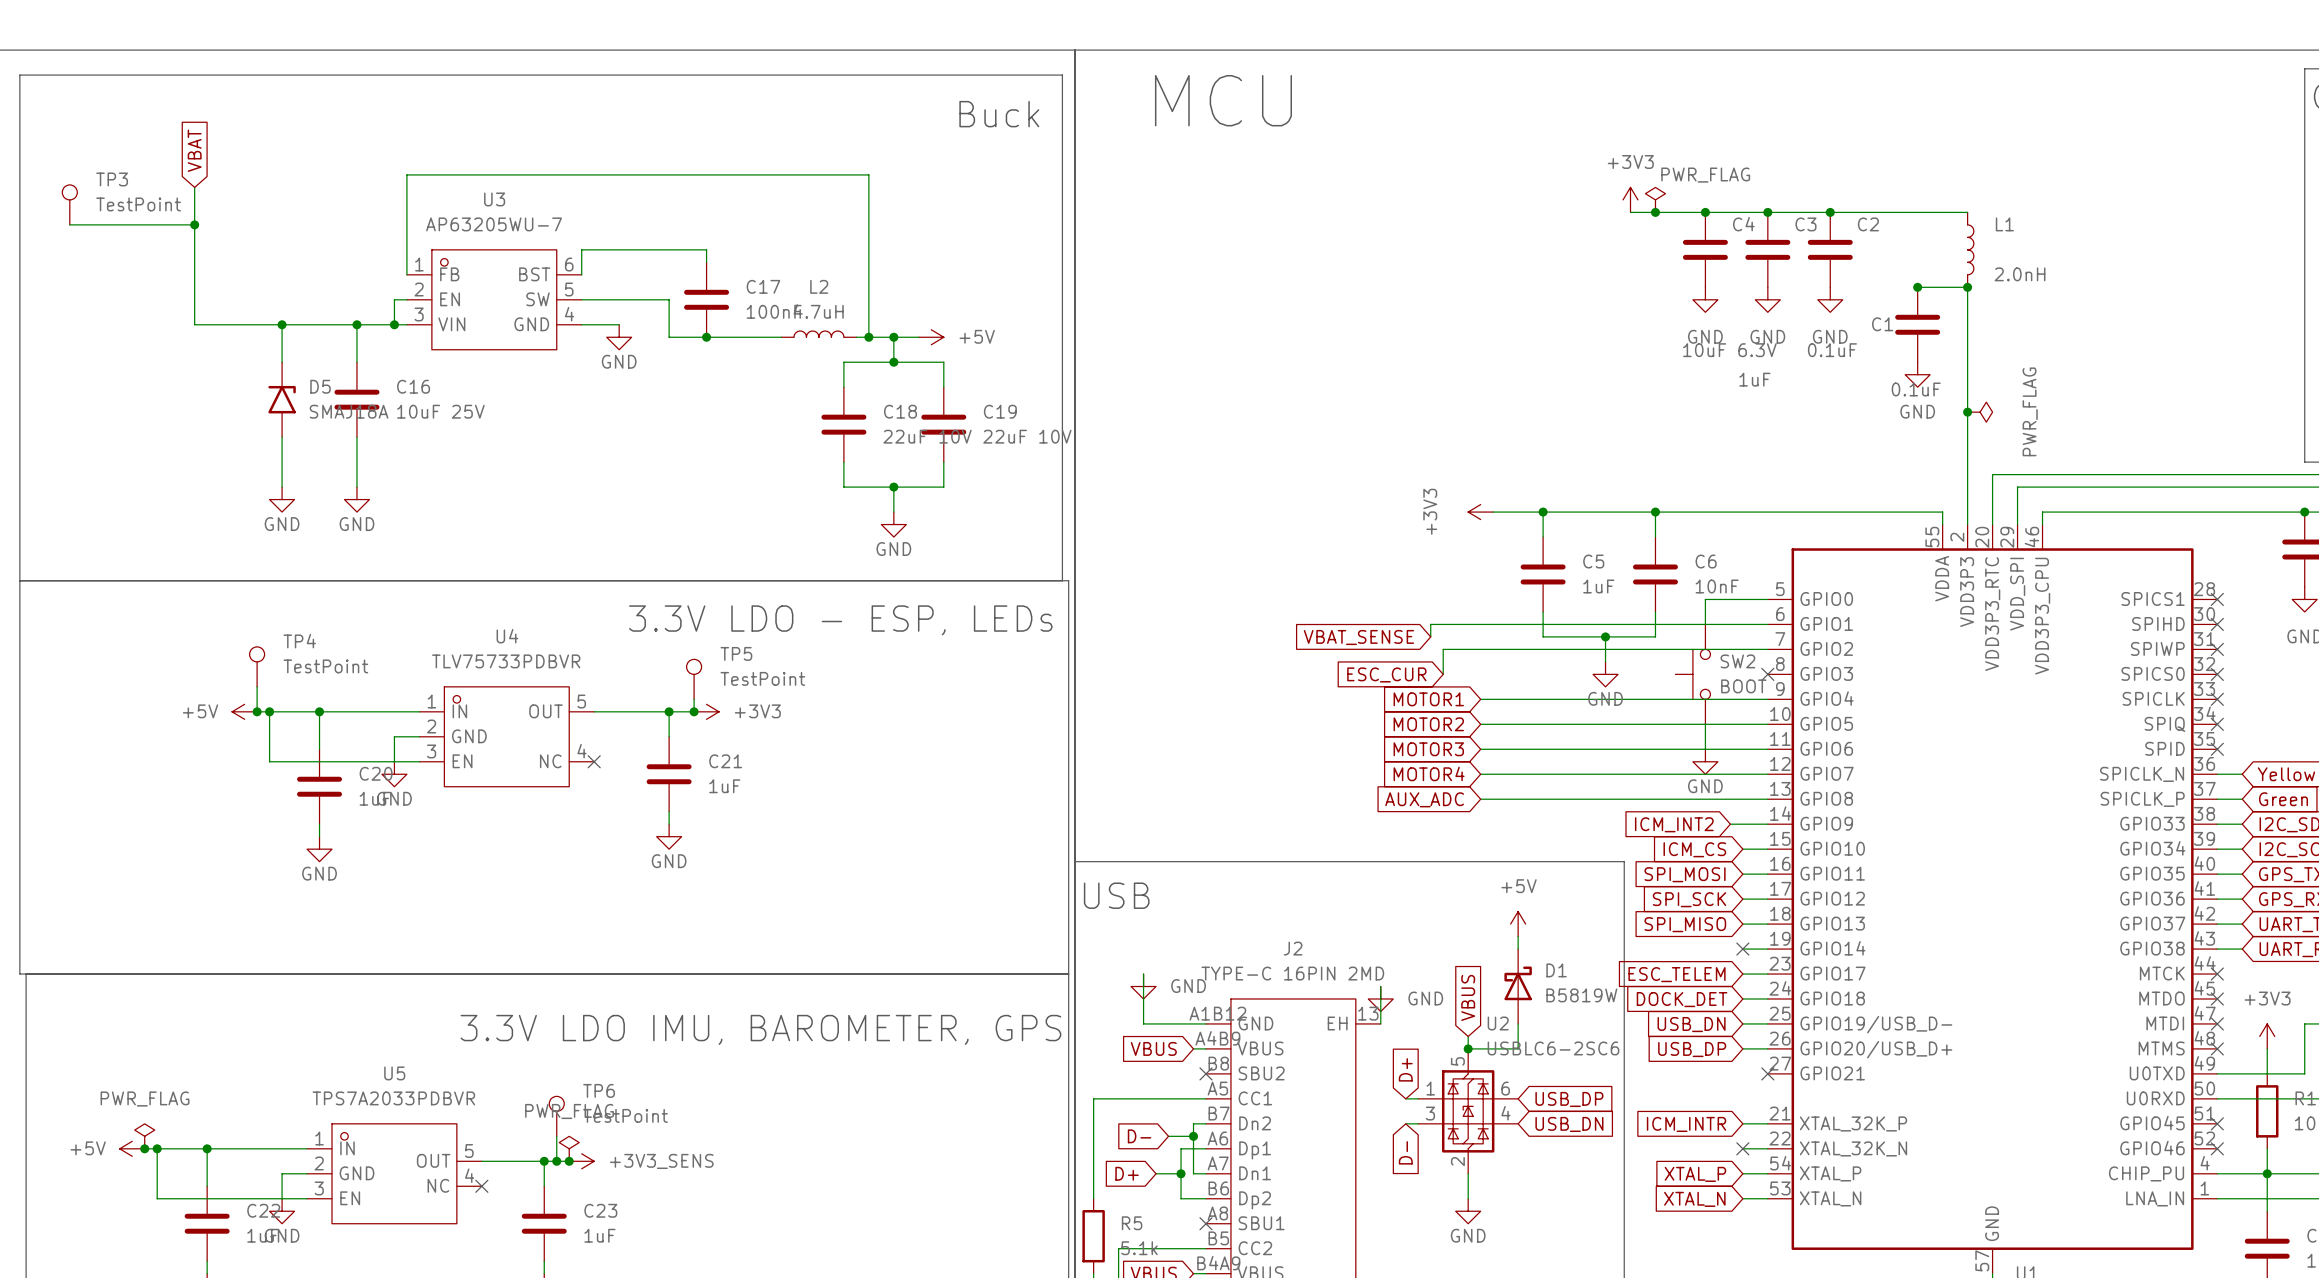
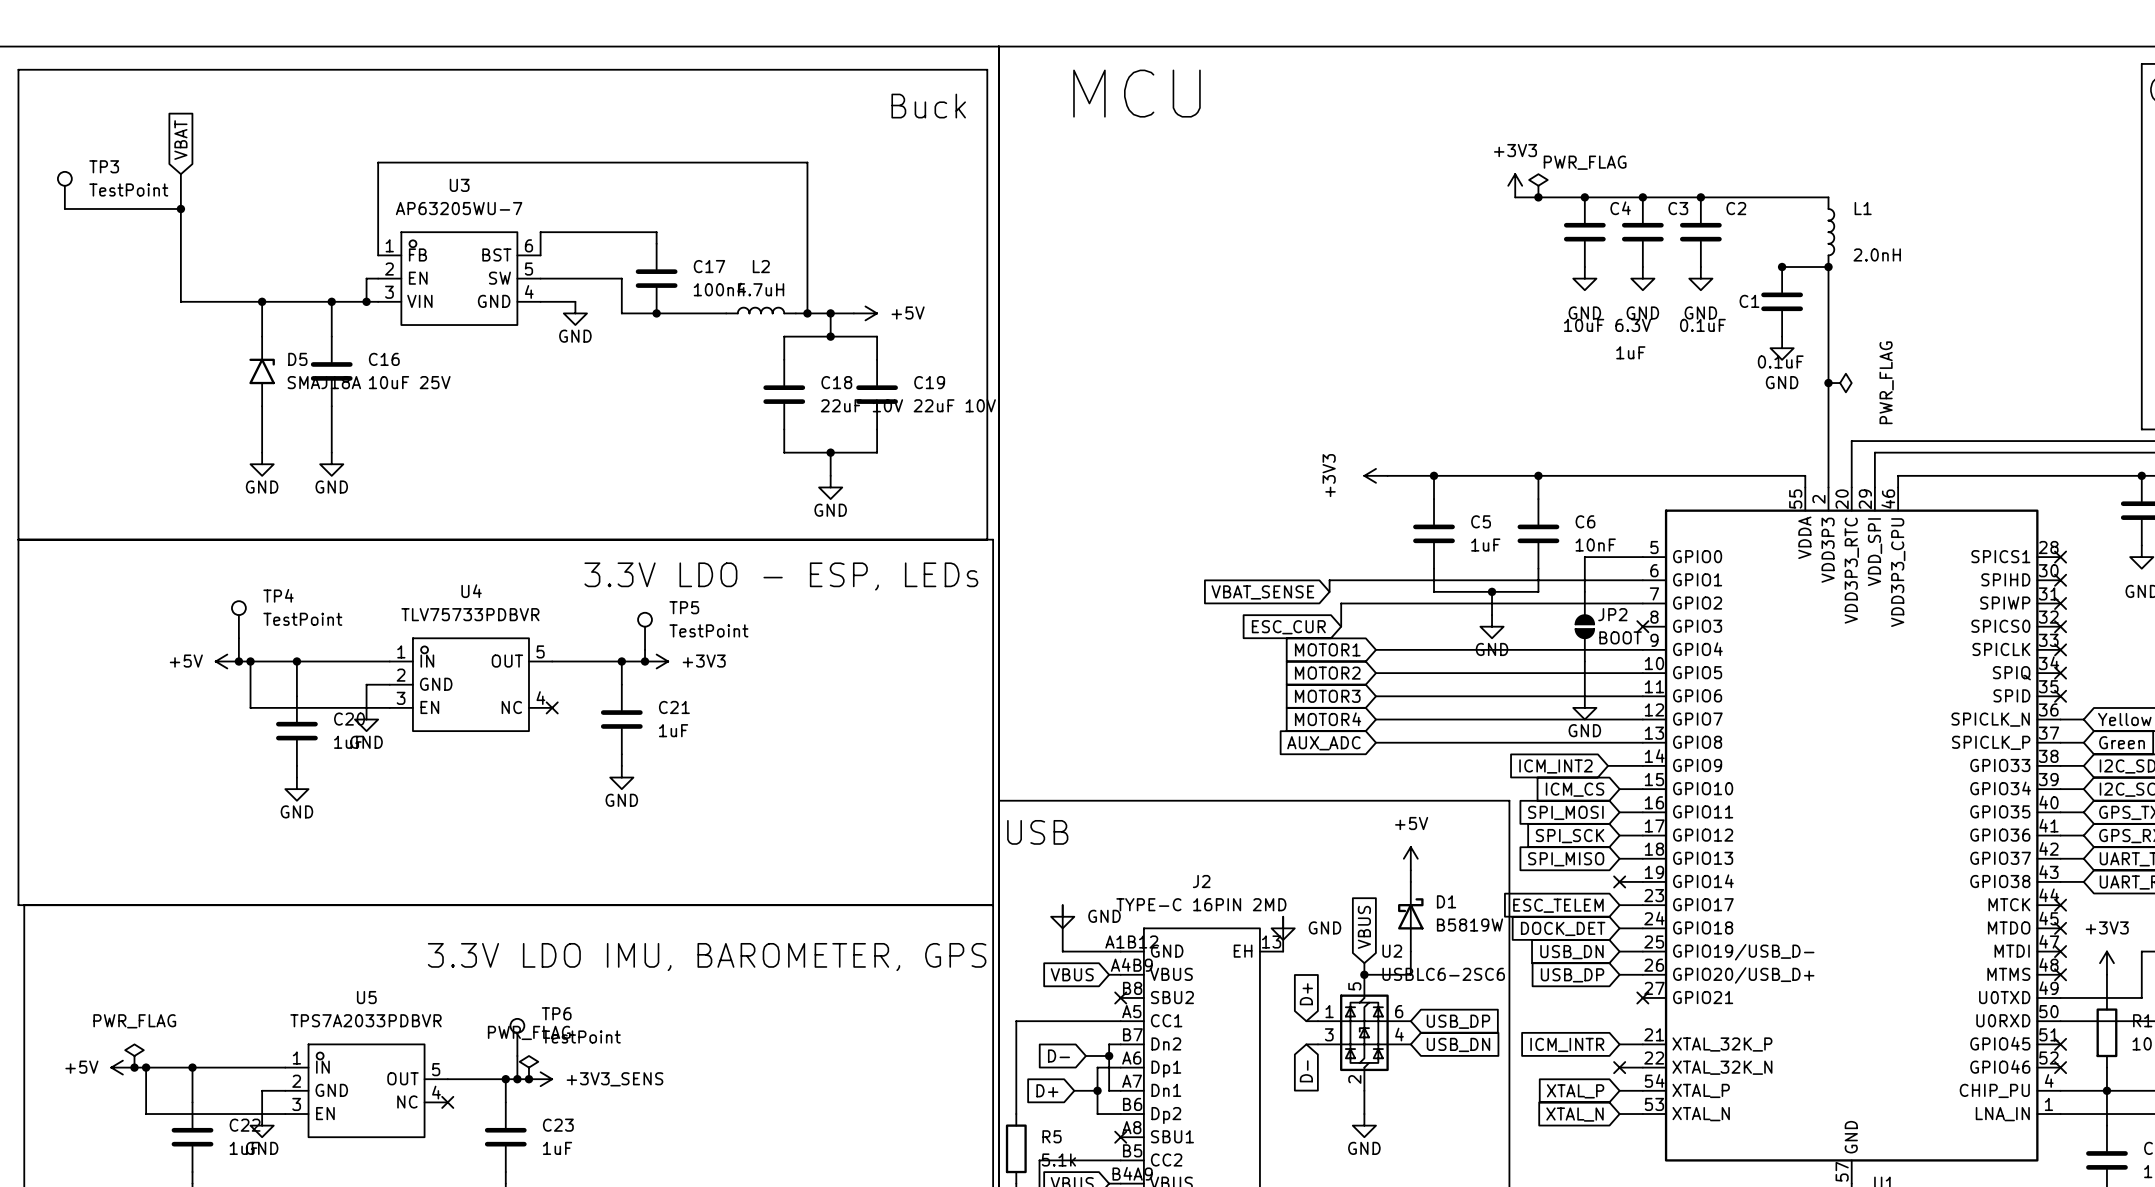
SW2: BOOT (1692, 674) -> none
JP2: none -> BOOT (1584, 626)

